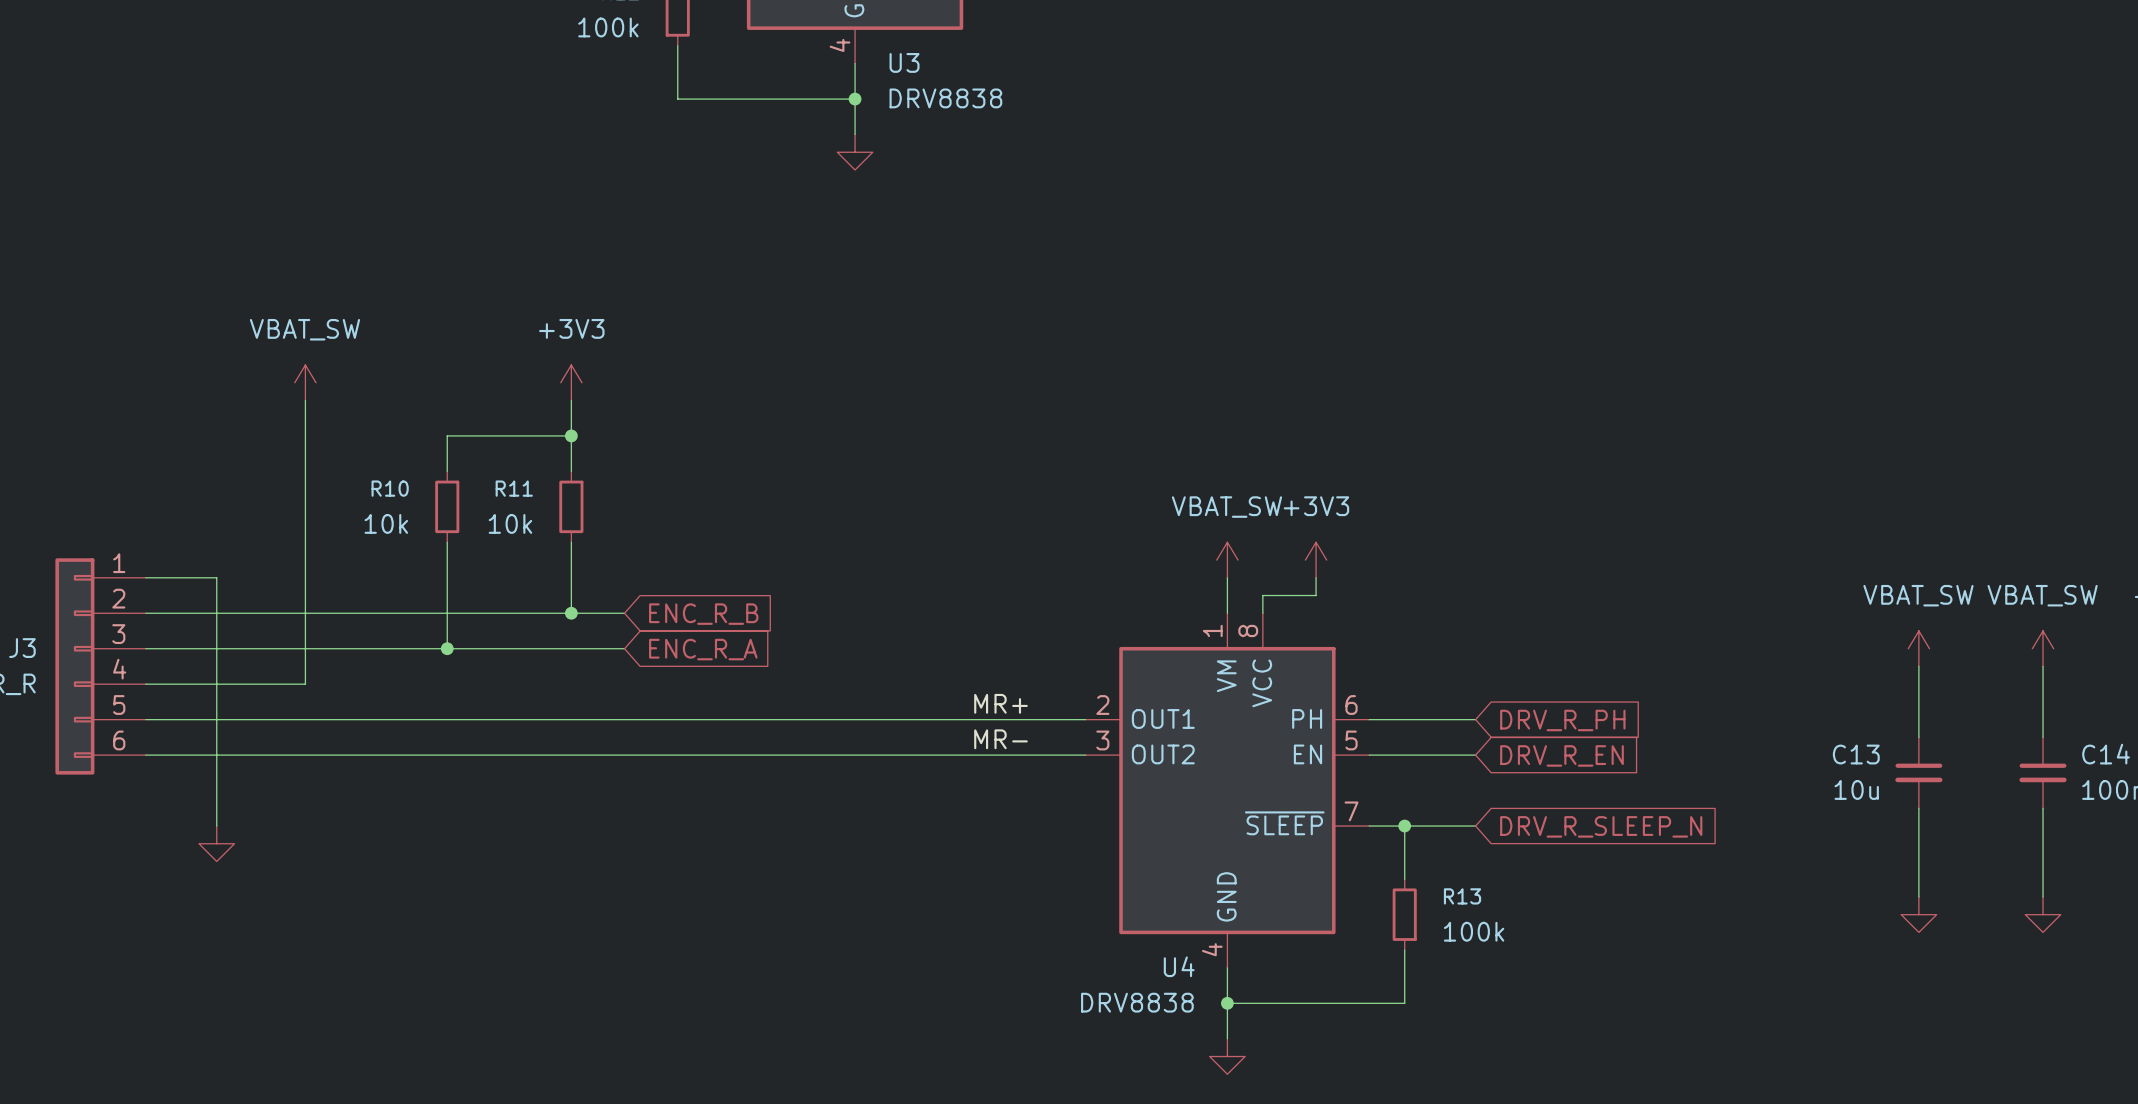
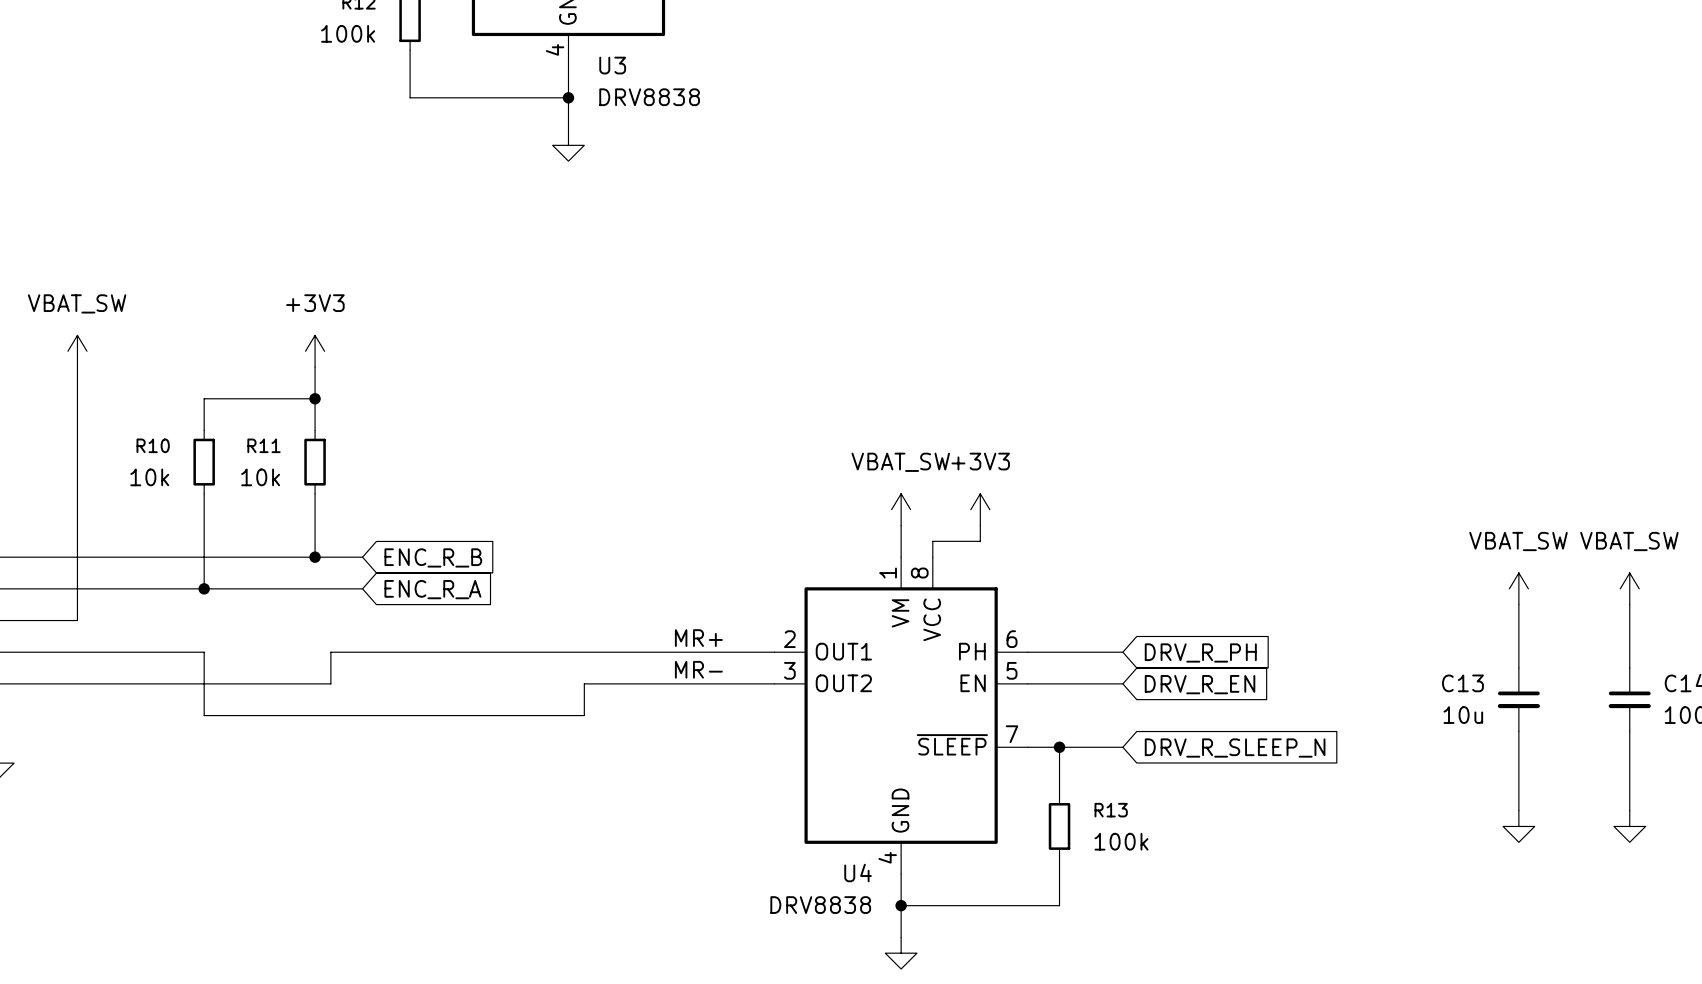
wire: (447, 719) (589, 719) -> (330, 683) (330, 652)
wire: (589, 755) (872, 755) -> (204, 652) (204, 715) (584, 715) (584, 683)

